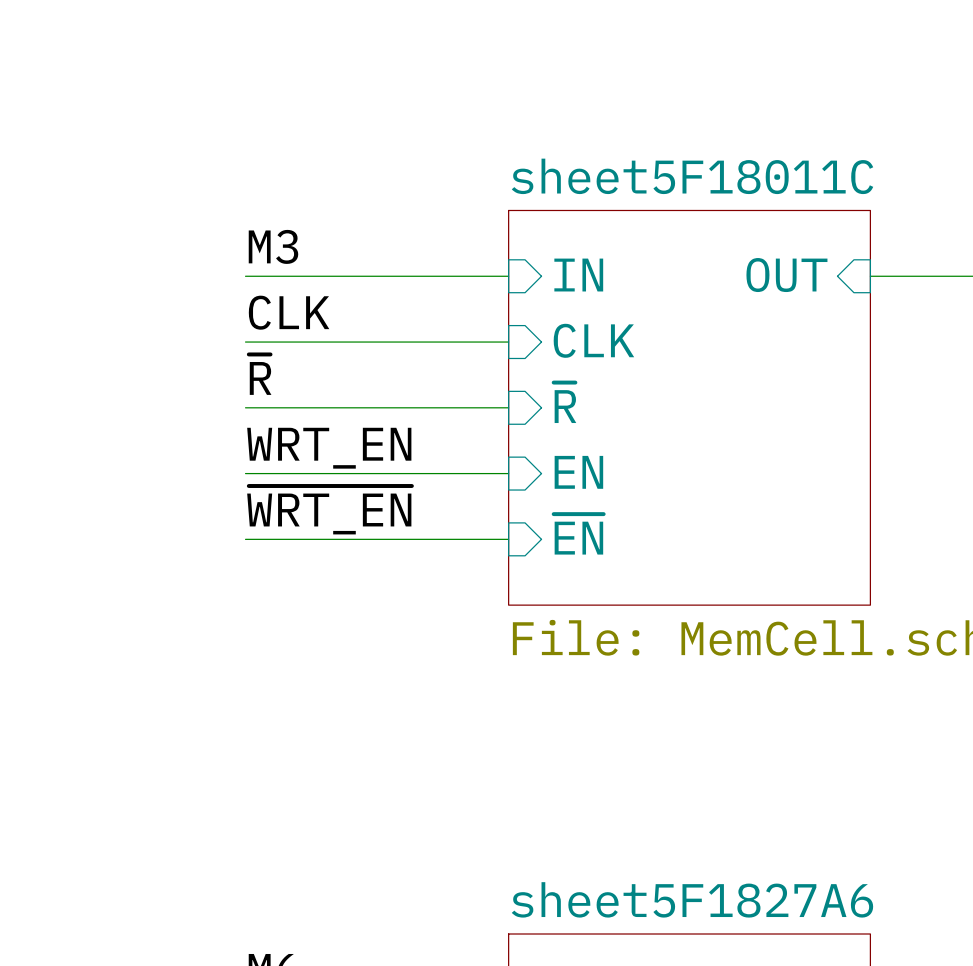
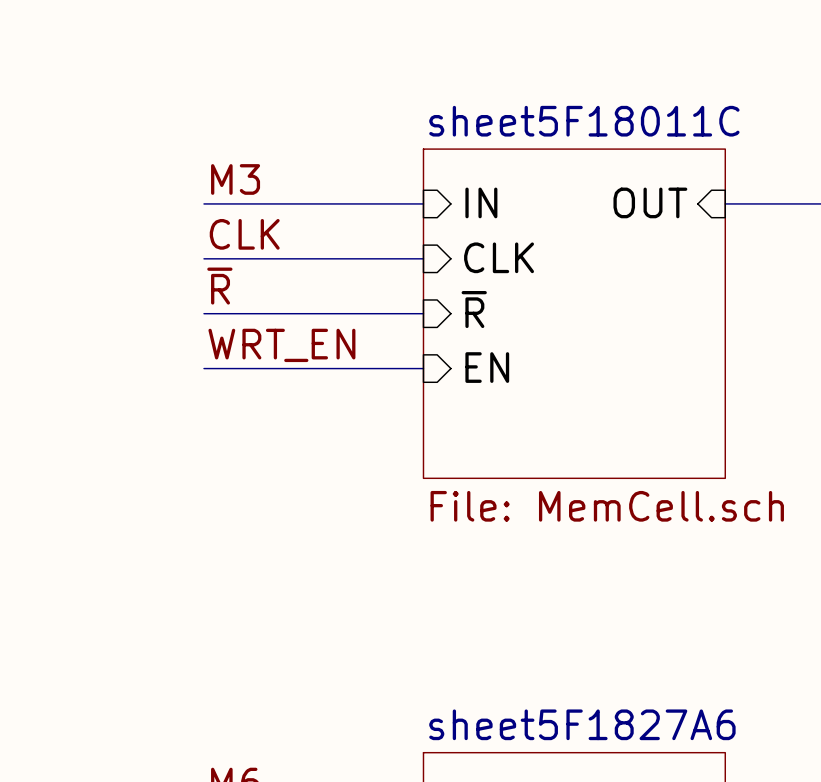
label: ~{WRT_EN} (329, 510) -> none
sheet pin: ~{EN} (578, 534) -> none
wire: (245, 539) (508, 539) -> none

